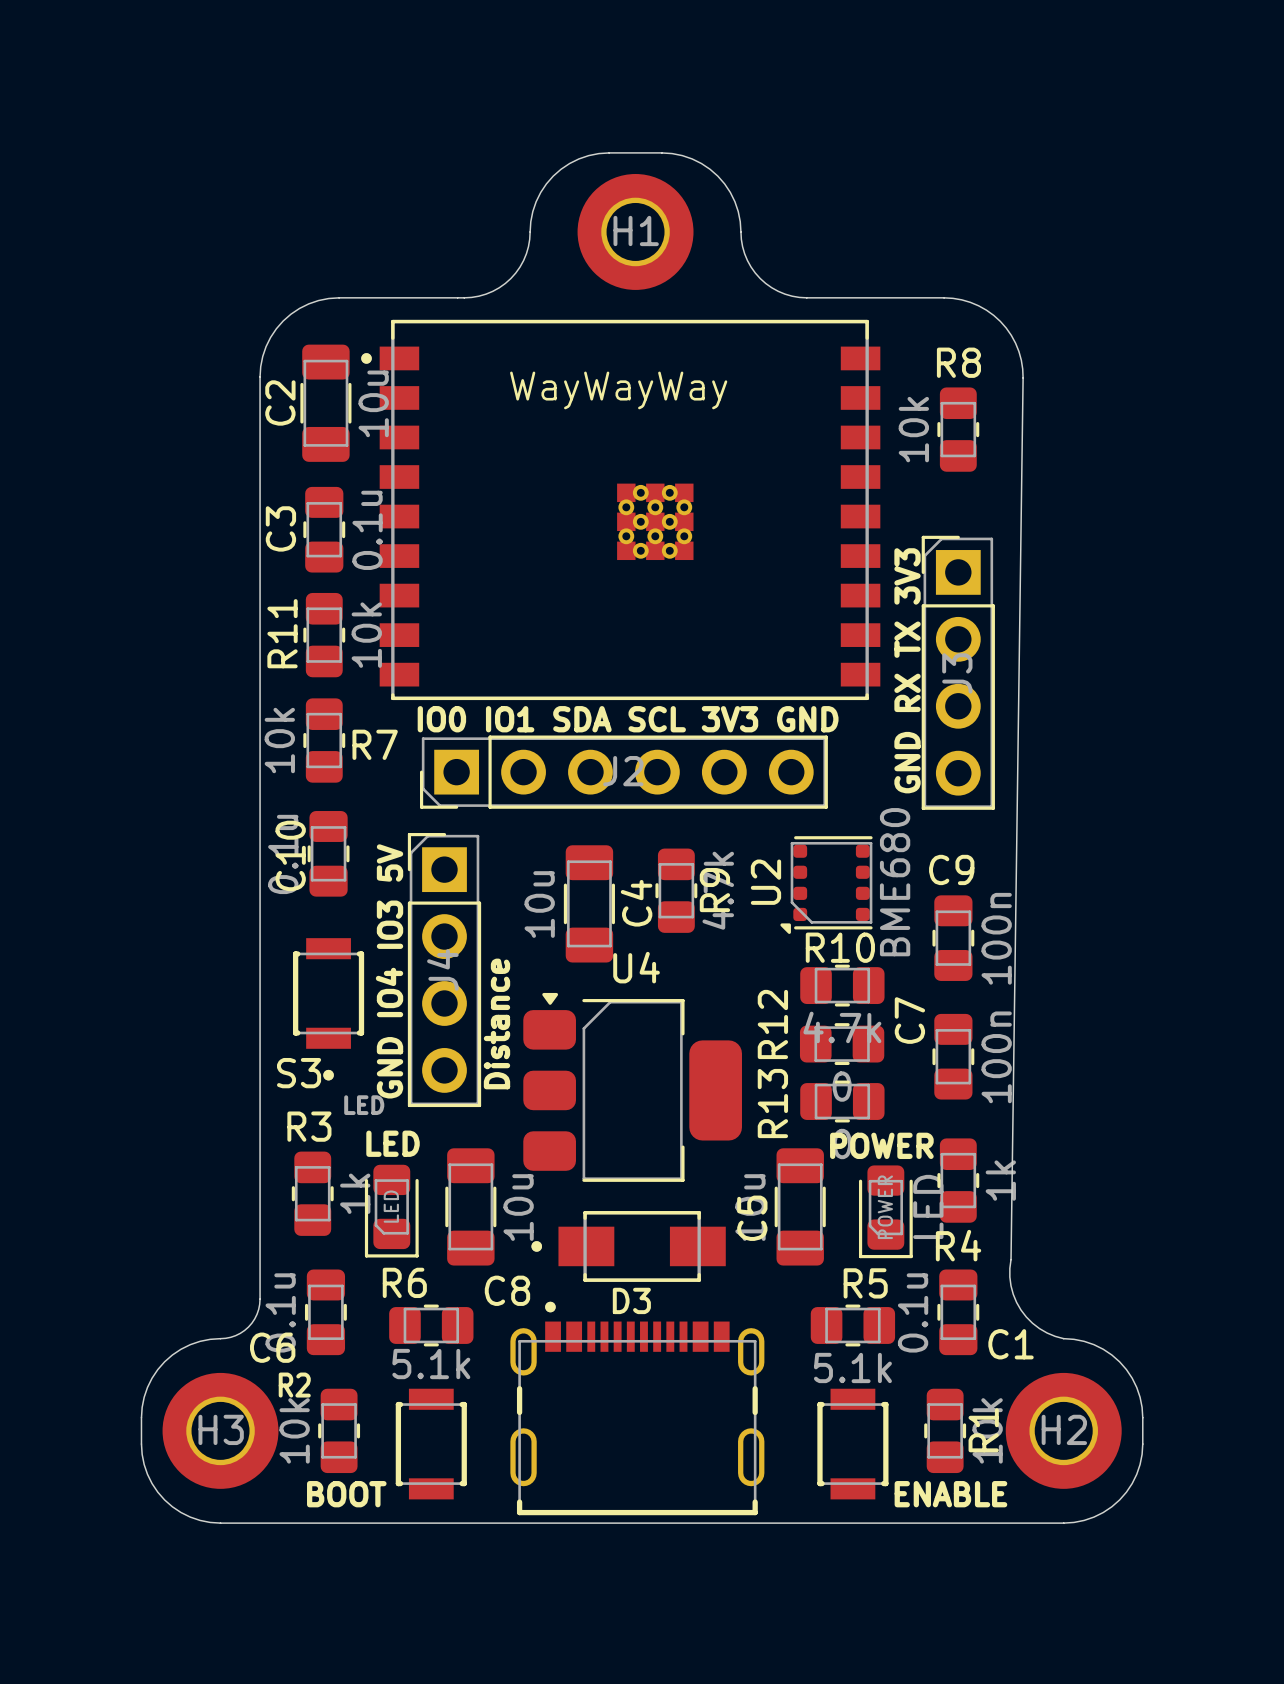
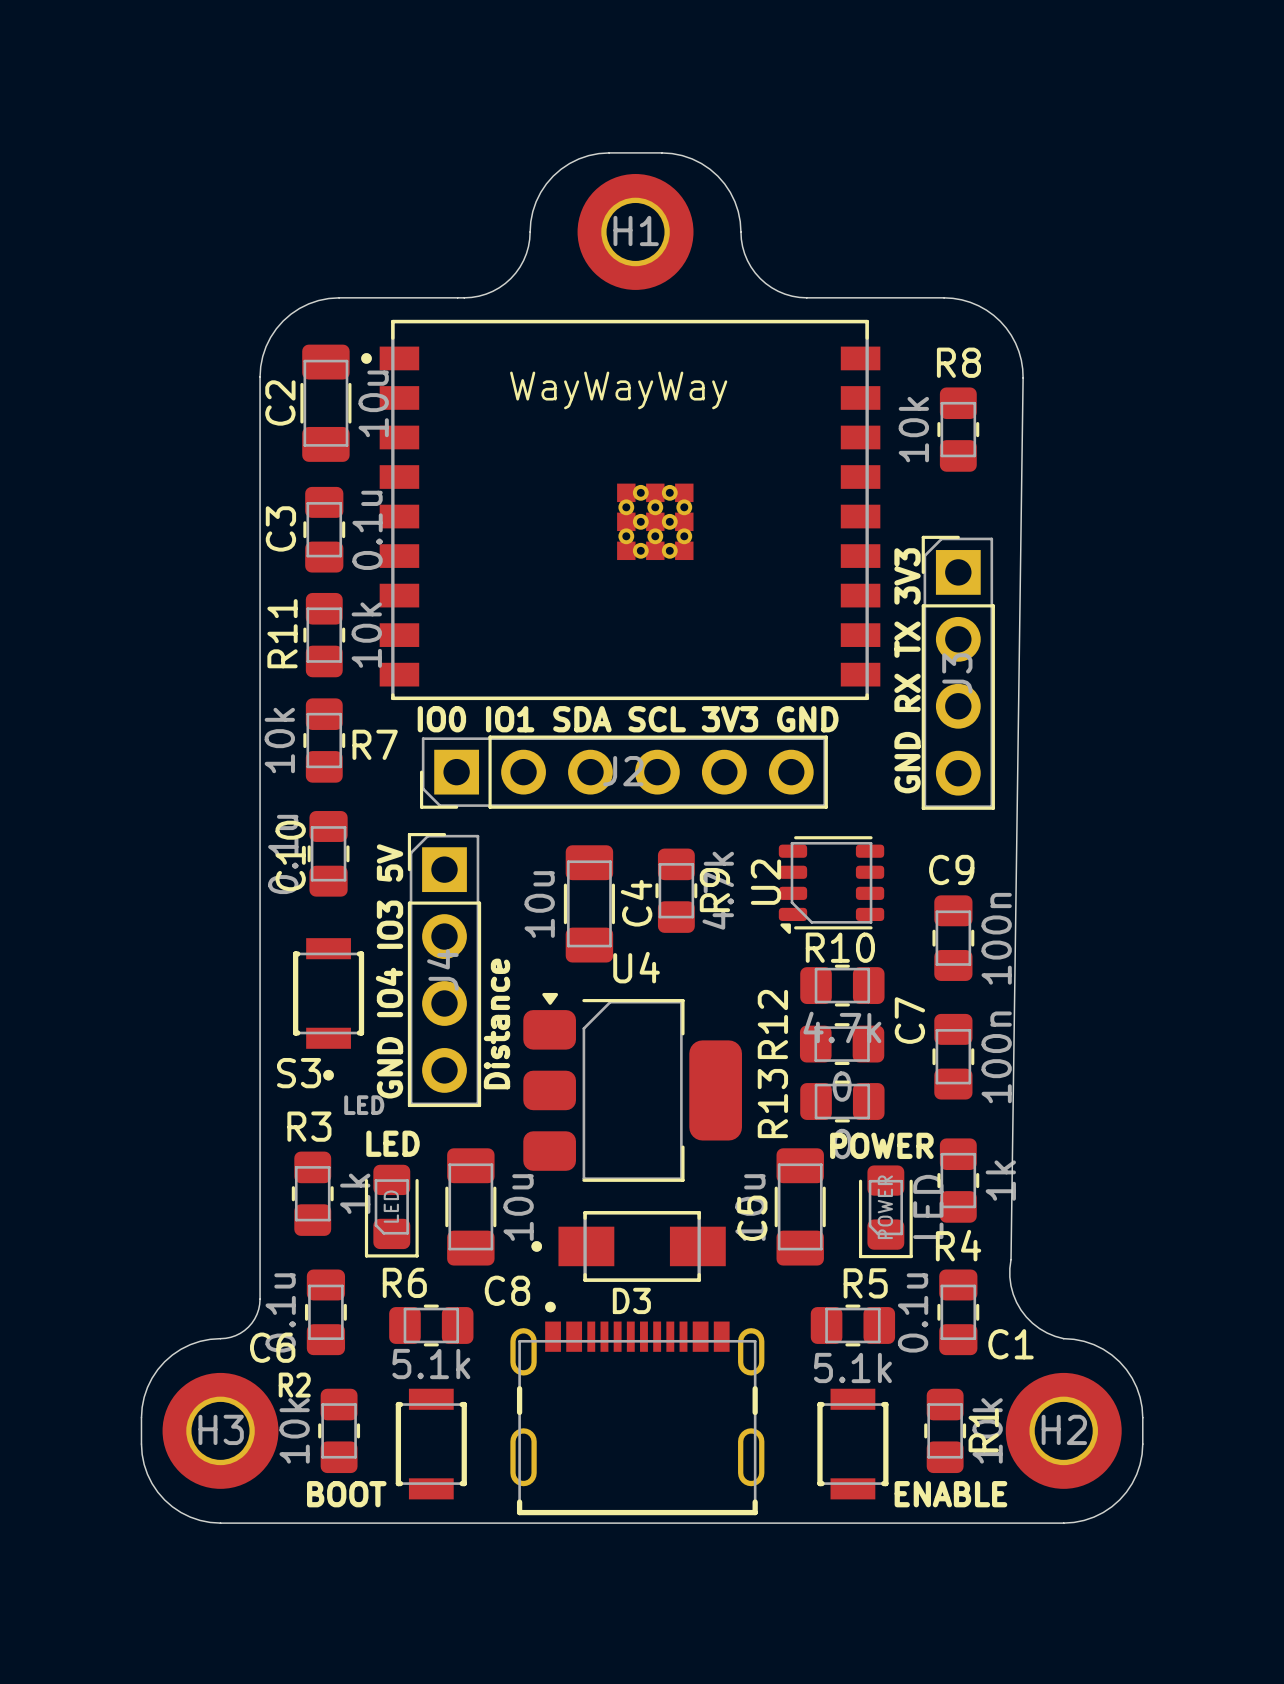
U2 footprint: [780, 836, 873, 934] -> [778, 836, 885, 934]
U2 value: BME680 (895, 882) -> none

